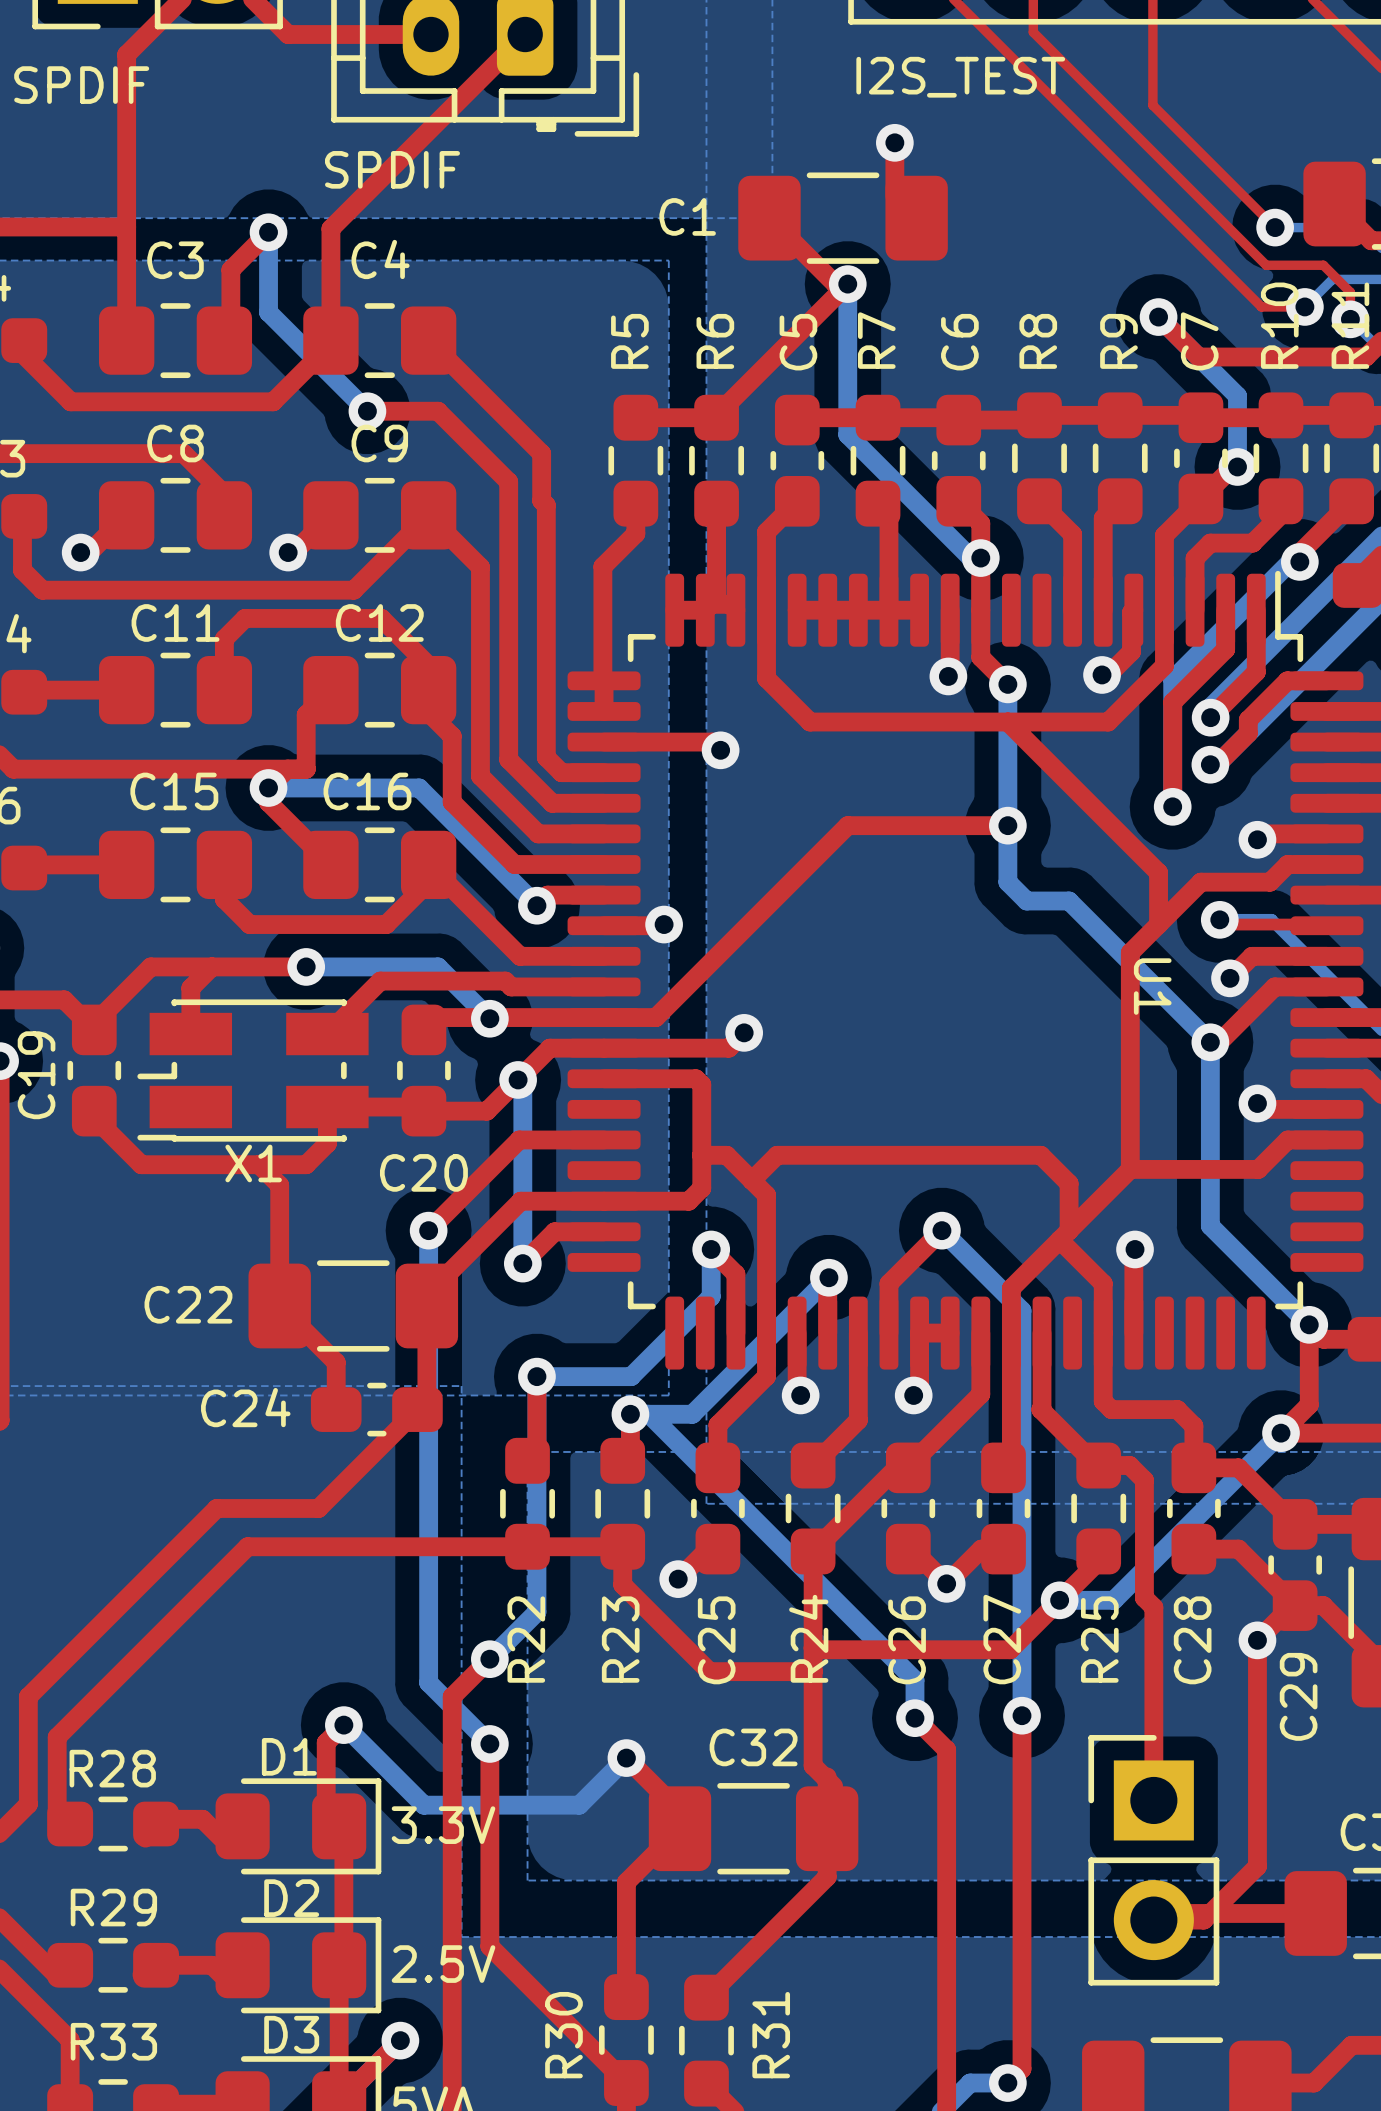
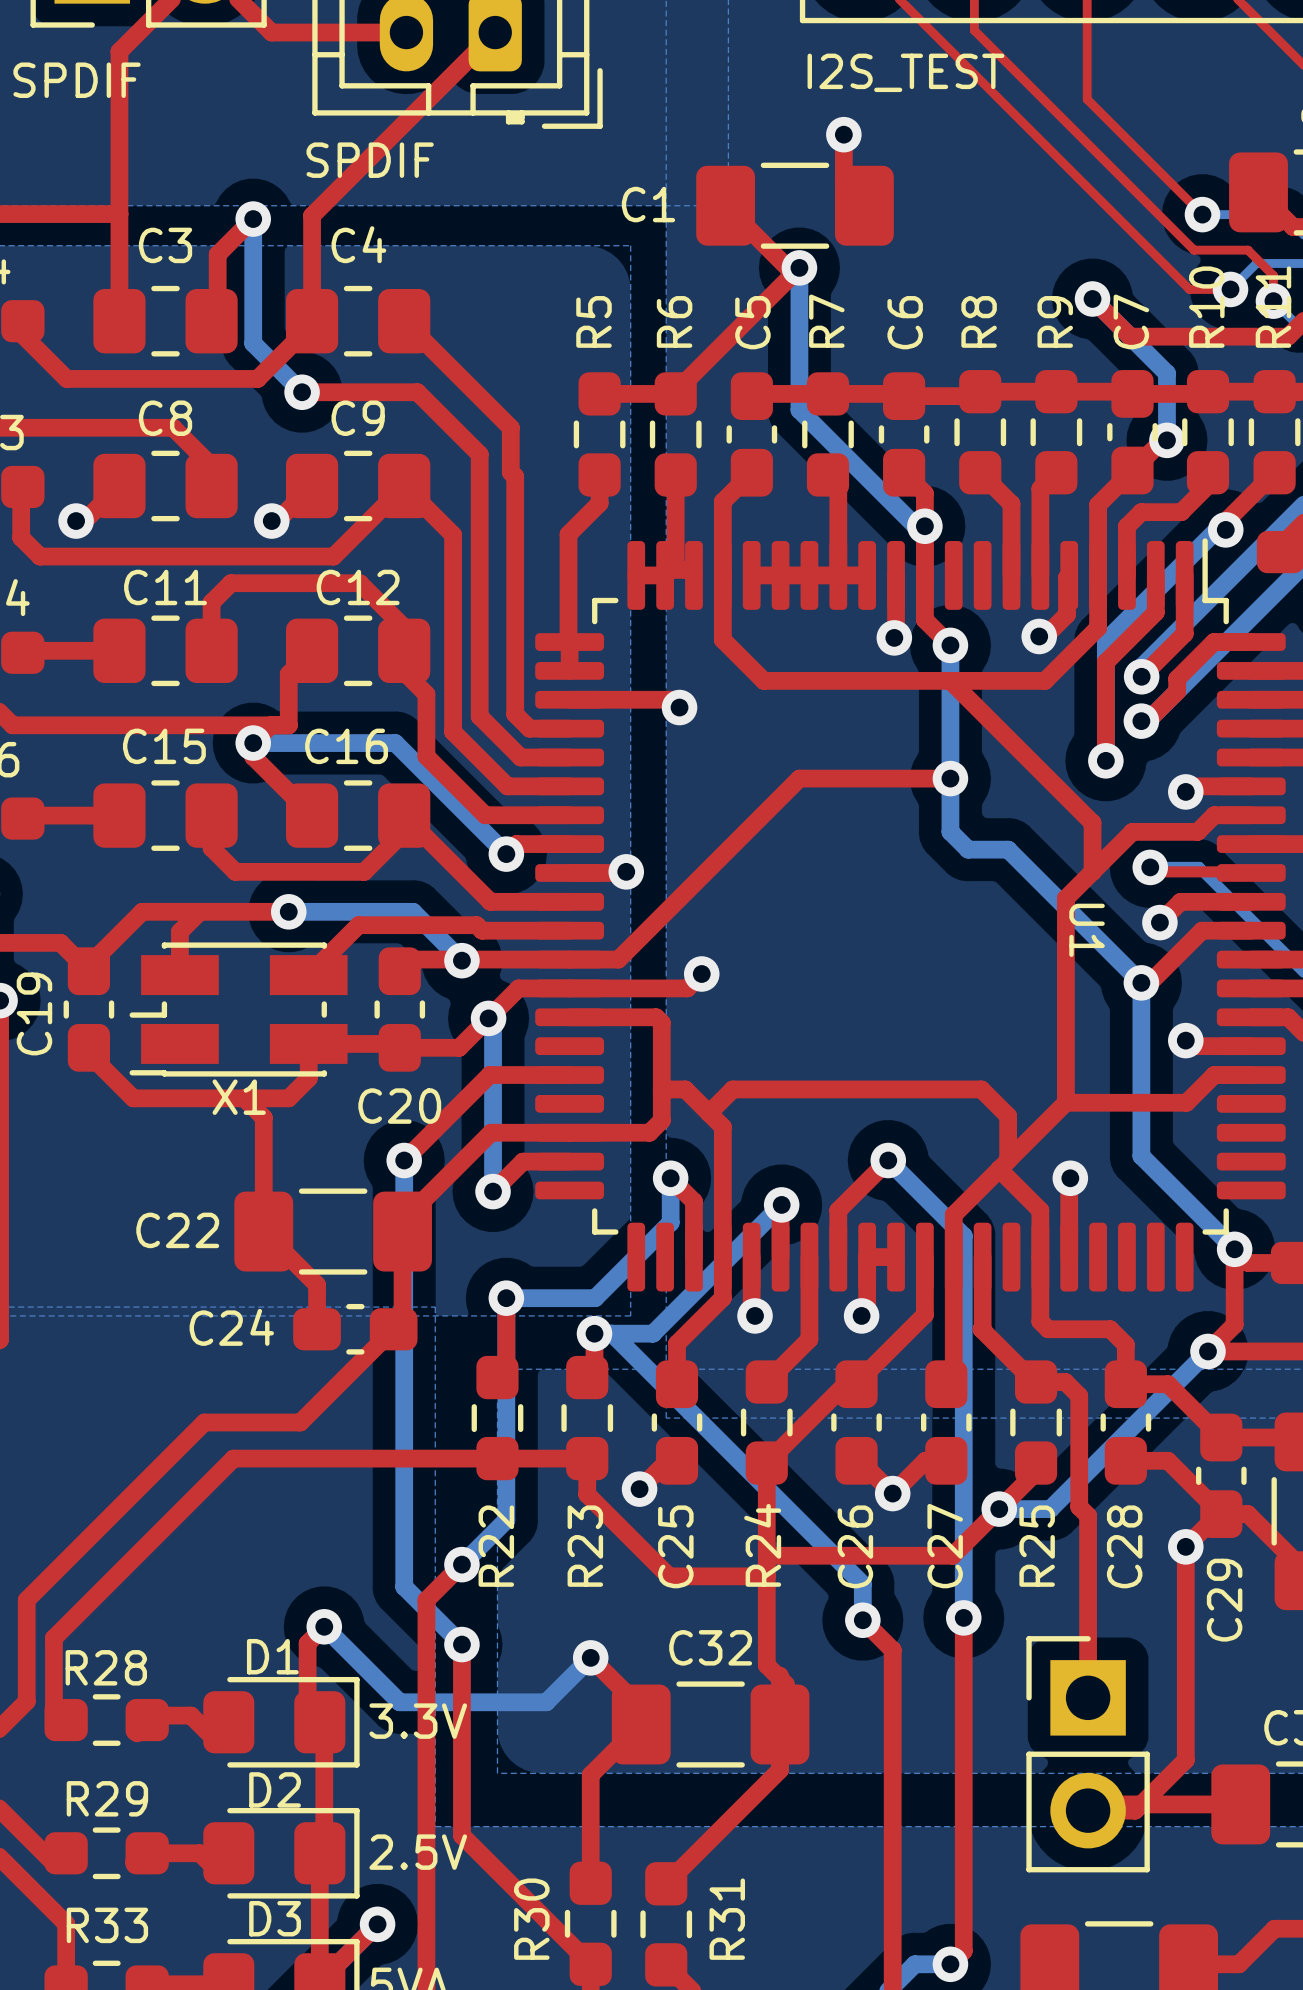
bottom track: (268, 312) (367, 411) -> (253, 294) (253, 343) (302, 392)
top track: (367, 411) (438, 411) (442, 415) -> (302, 392) (417, 392)
via position: (367, 411) -> (302, 392)

